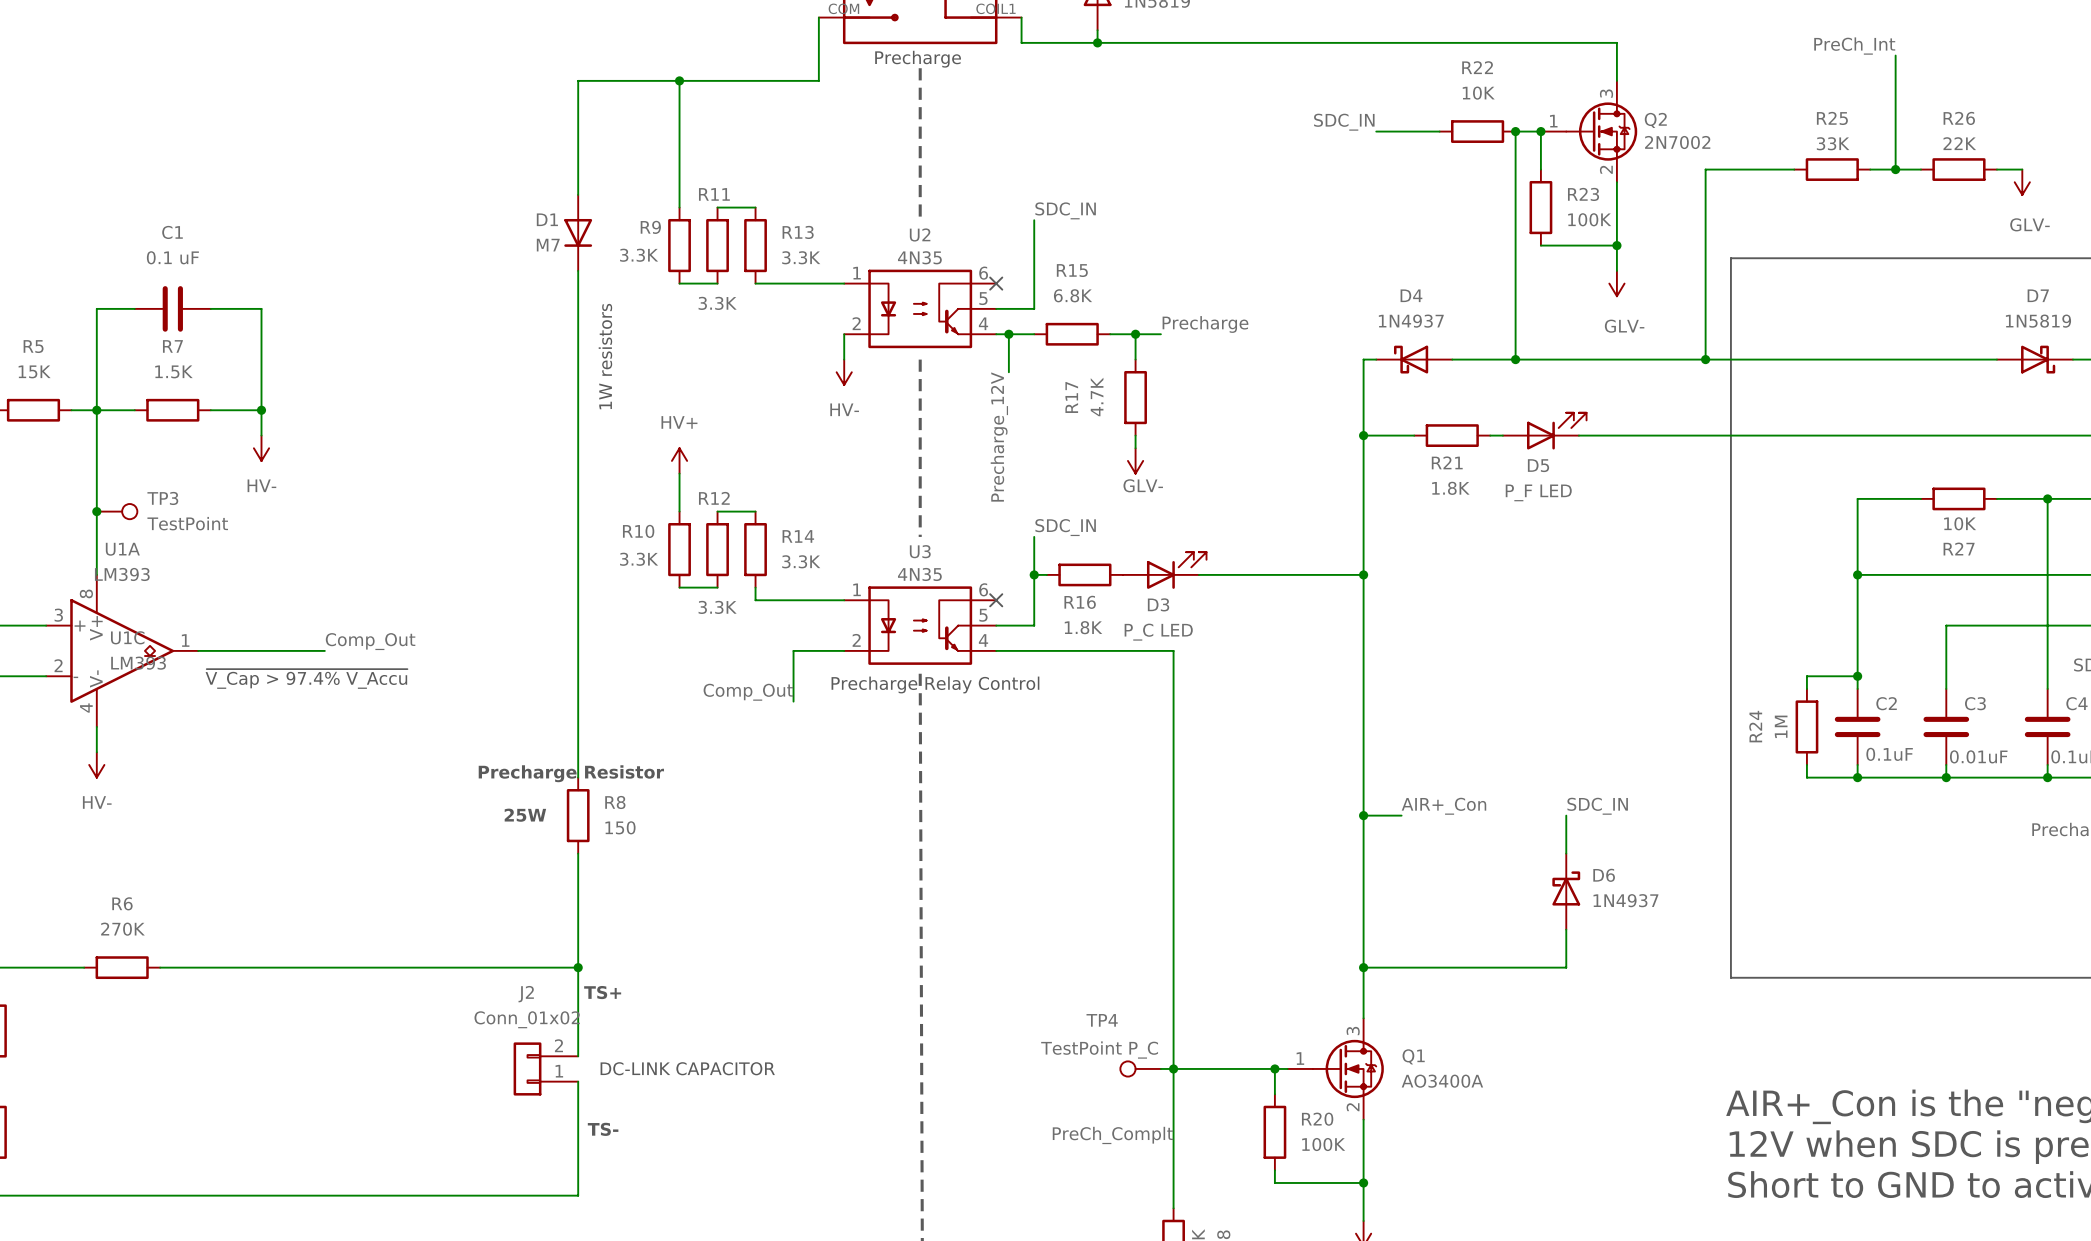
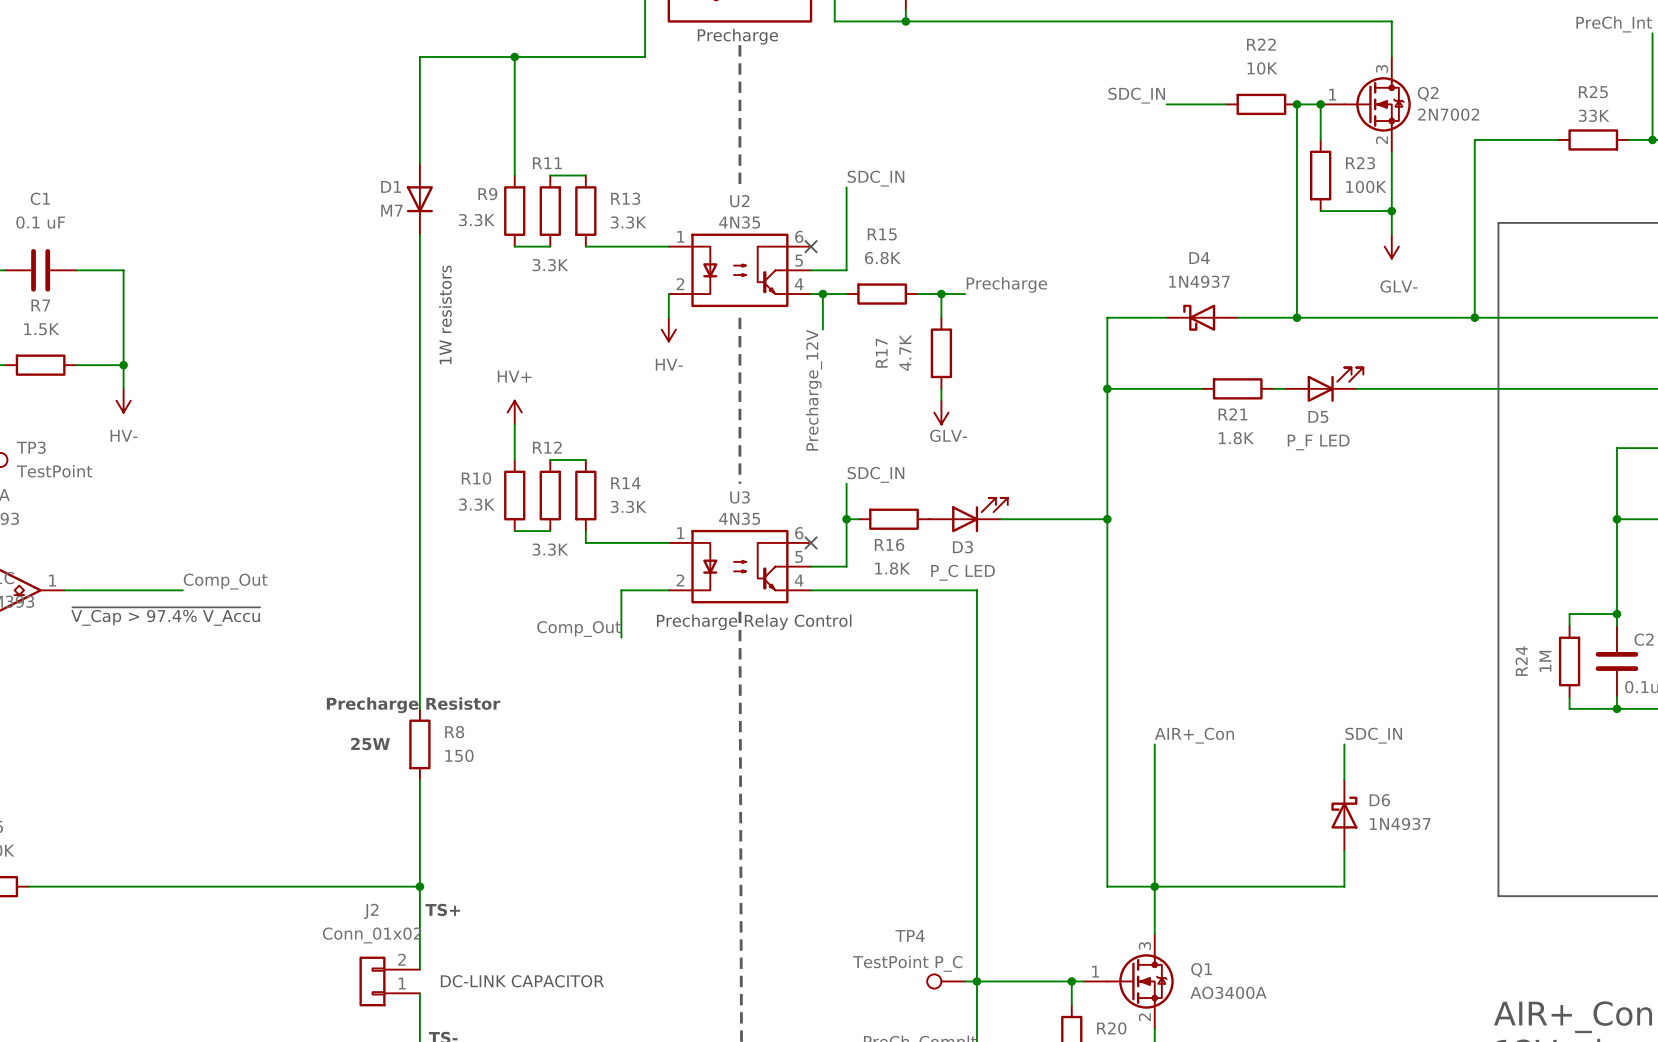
wire: (1363, 359) (1363, 815) (1401, 815) -> (1154, 317) (1107, 317) (1107, 886) (1154, 886)
junction position: (1363, 435) -> (1107, 388)
wire: (1312, 574) (1363, 574) -> (1107, 388) (1154, 388)
junction position: (1363, 574) -> (1107, 519)
label position: AIR+_Con (1443, 806) -> AIR+_Con (1194, 735)
junction: (1363, 815) -> none

